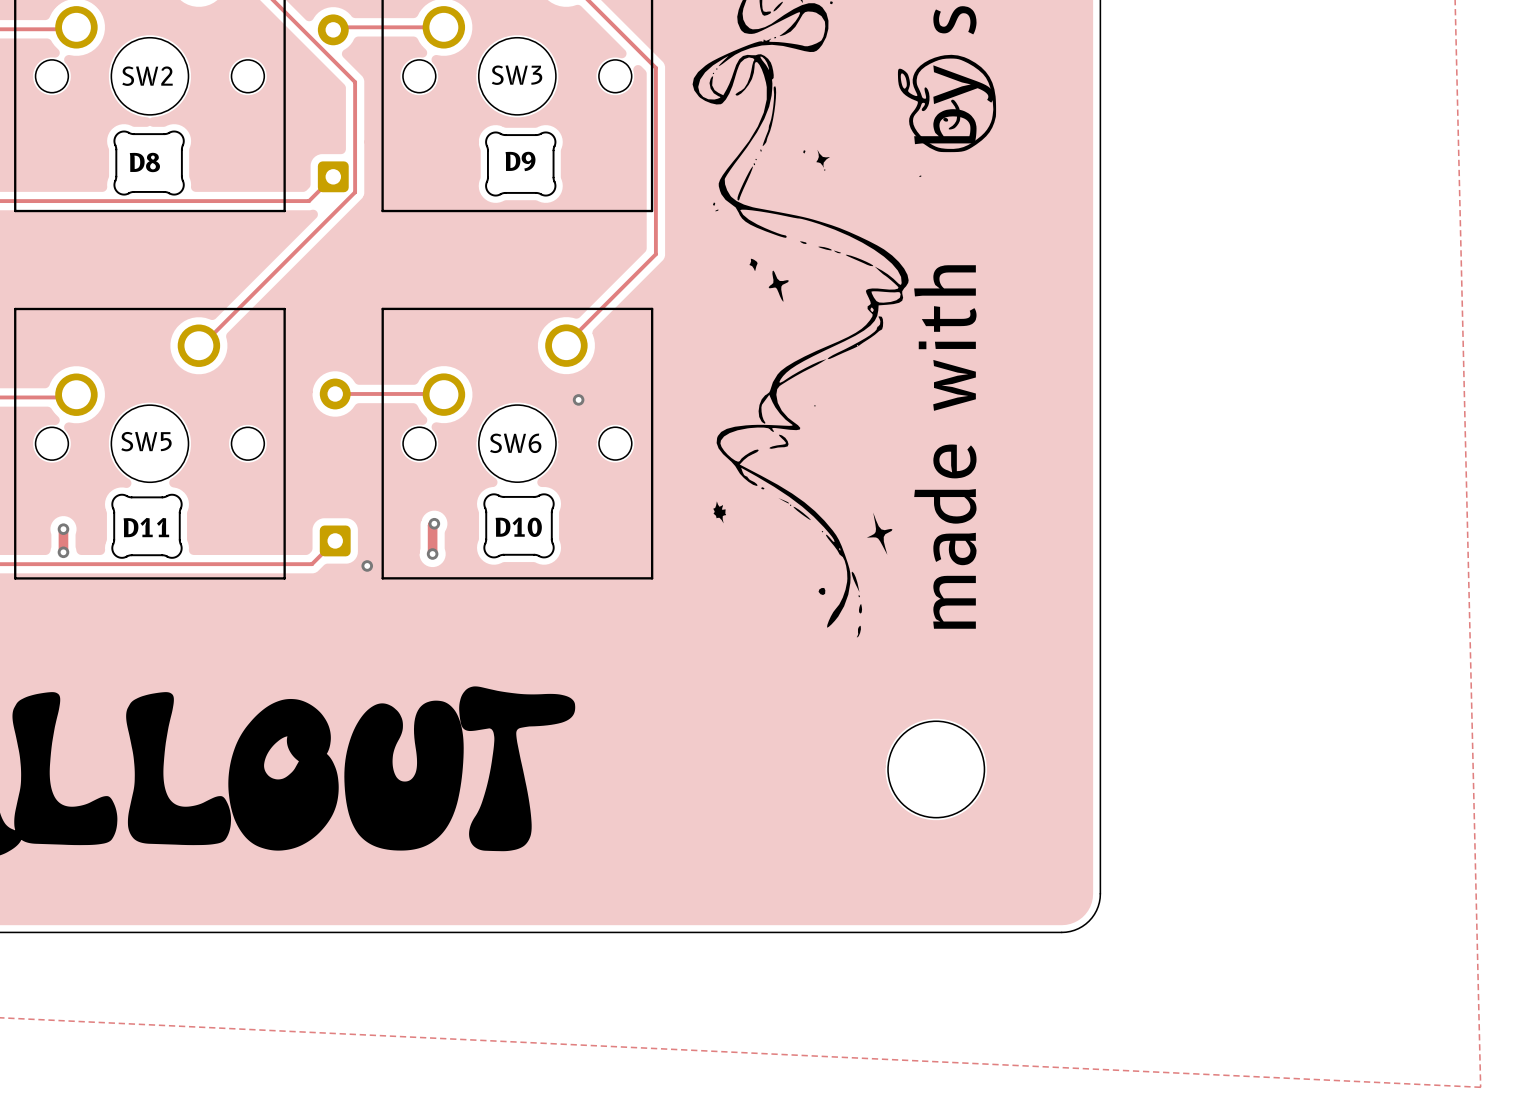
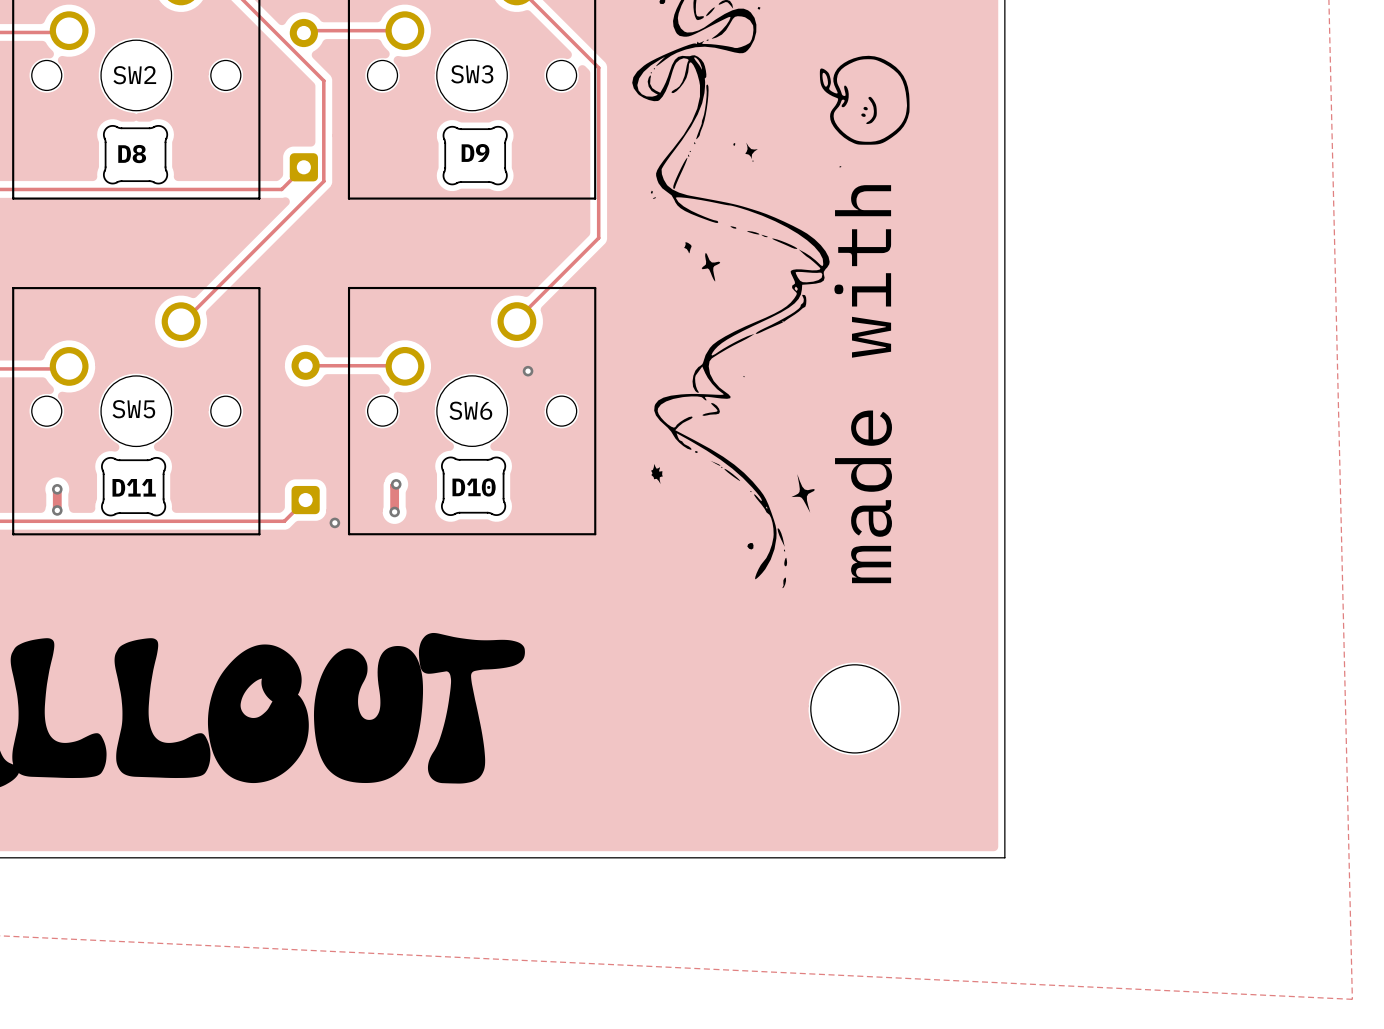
board edge: (1100, 893) (1098, 906) (1089, 921) (1074, 930) (1061, 932) -> (1004, 822) (1004, 857) (969, 857)

